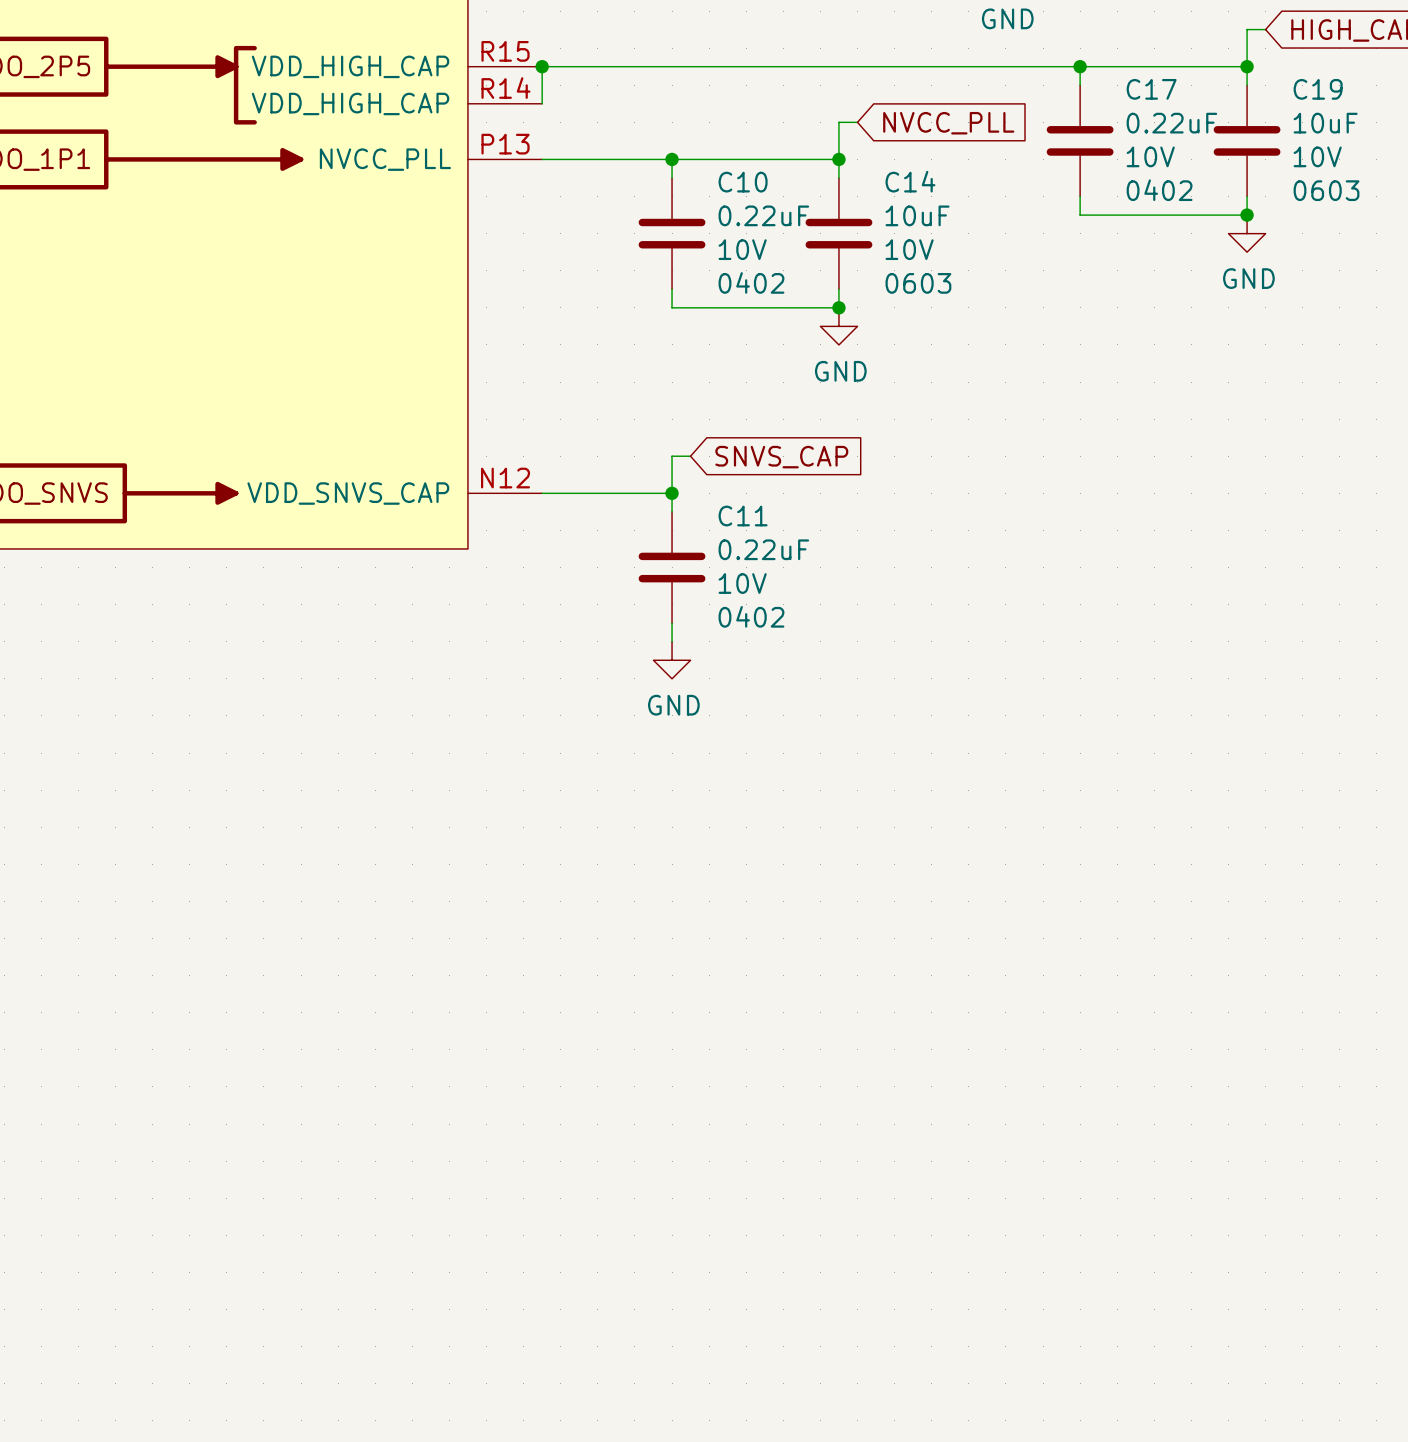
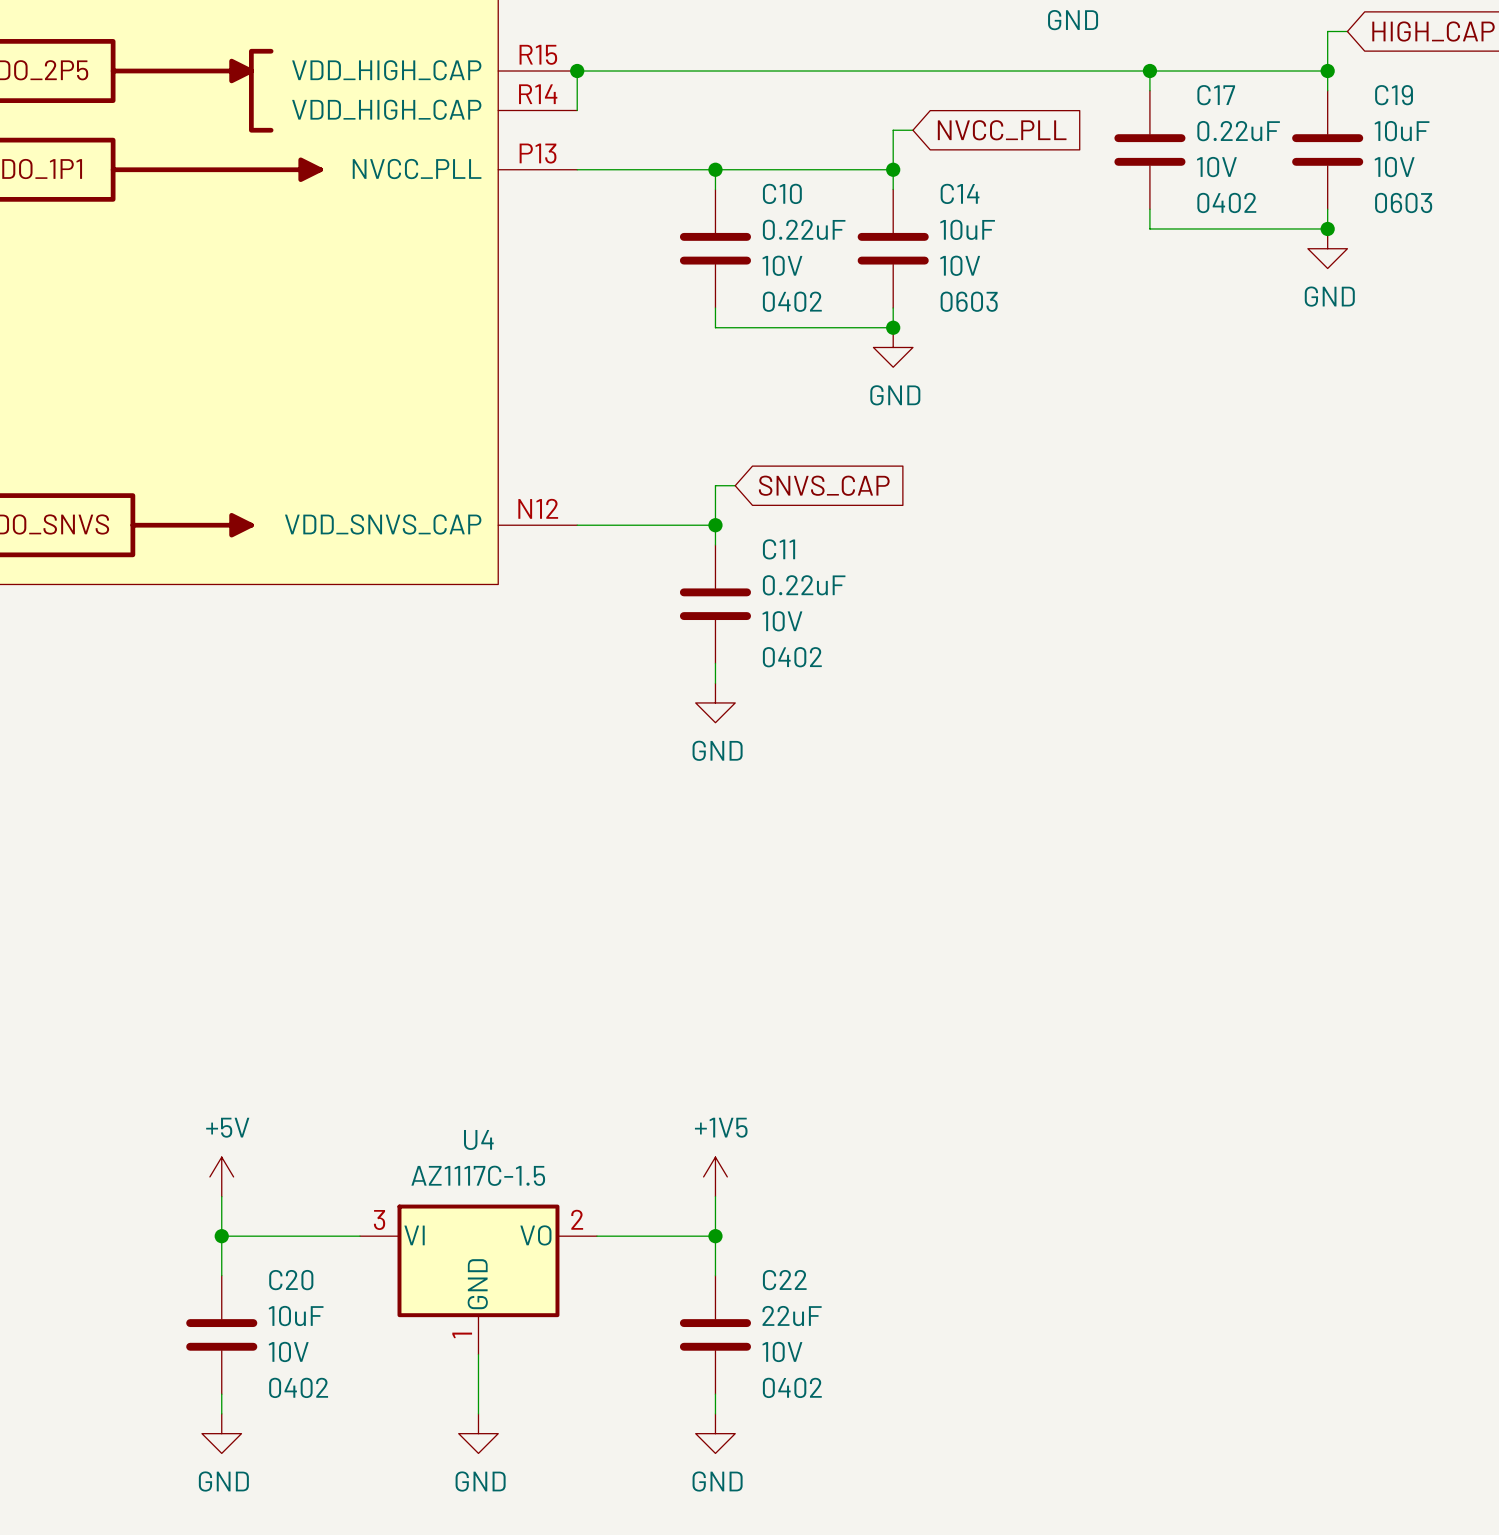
power symbol: none -> +5V (221, 1176)
power symbol: none -> +1V5 (715, 1176)
wire: none -> (221, 1196) (221, 1275)
wire: none -> (715, 1196) (715, 1275)
wire: none -> (221, 1236) (359, 1236)
junction: none -> (221, 1236)
wire: none -> (596, 1236) (715, 1236)
junction: none -> (715, 1236)
U4: none -> AZ1117C-1.5 (478, 1279)
C20: none -> 10uF (221, 1334)
C22: none -> 22uF (715, 1334)
wire: none -> (478, 1354) (478, 1413)
wire: none -> (221, 1394) (221, 1413)
wire: none -> (715, 1394) (715, 1413)
power symbol: none -> GND (221, 1433)
power symbol: none -> GND (478, 1433)
power symbol: none -> GND (715, 1433)

